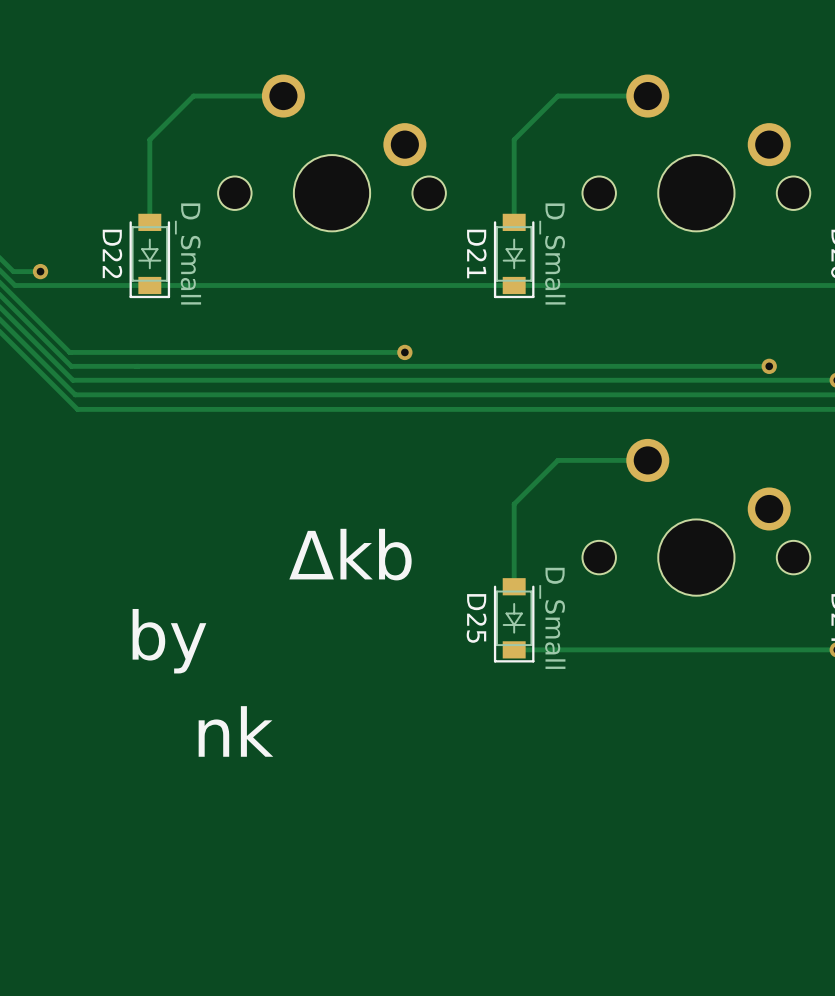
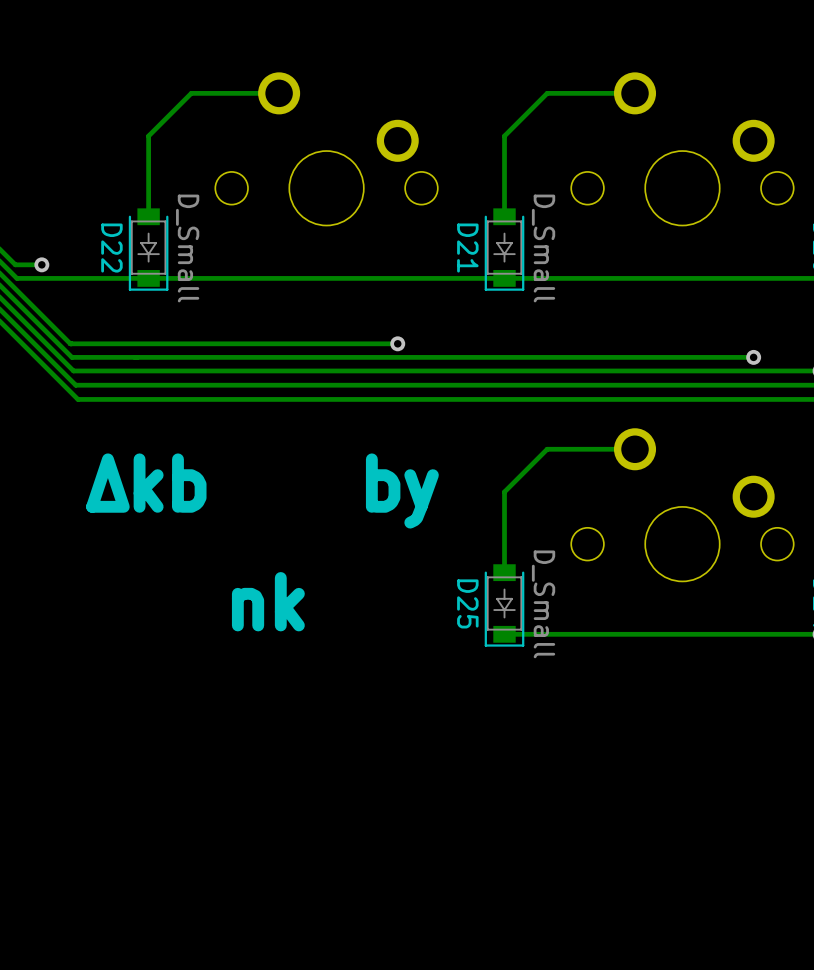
text position: Δkb (350, 554) -> Δkb (146, 483)
text position: by (169, 641) -> by (402, 490)
text position: nk (235, 731) -> nk (268, 601)

